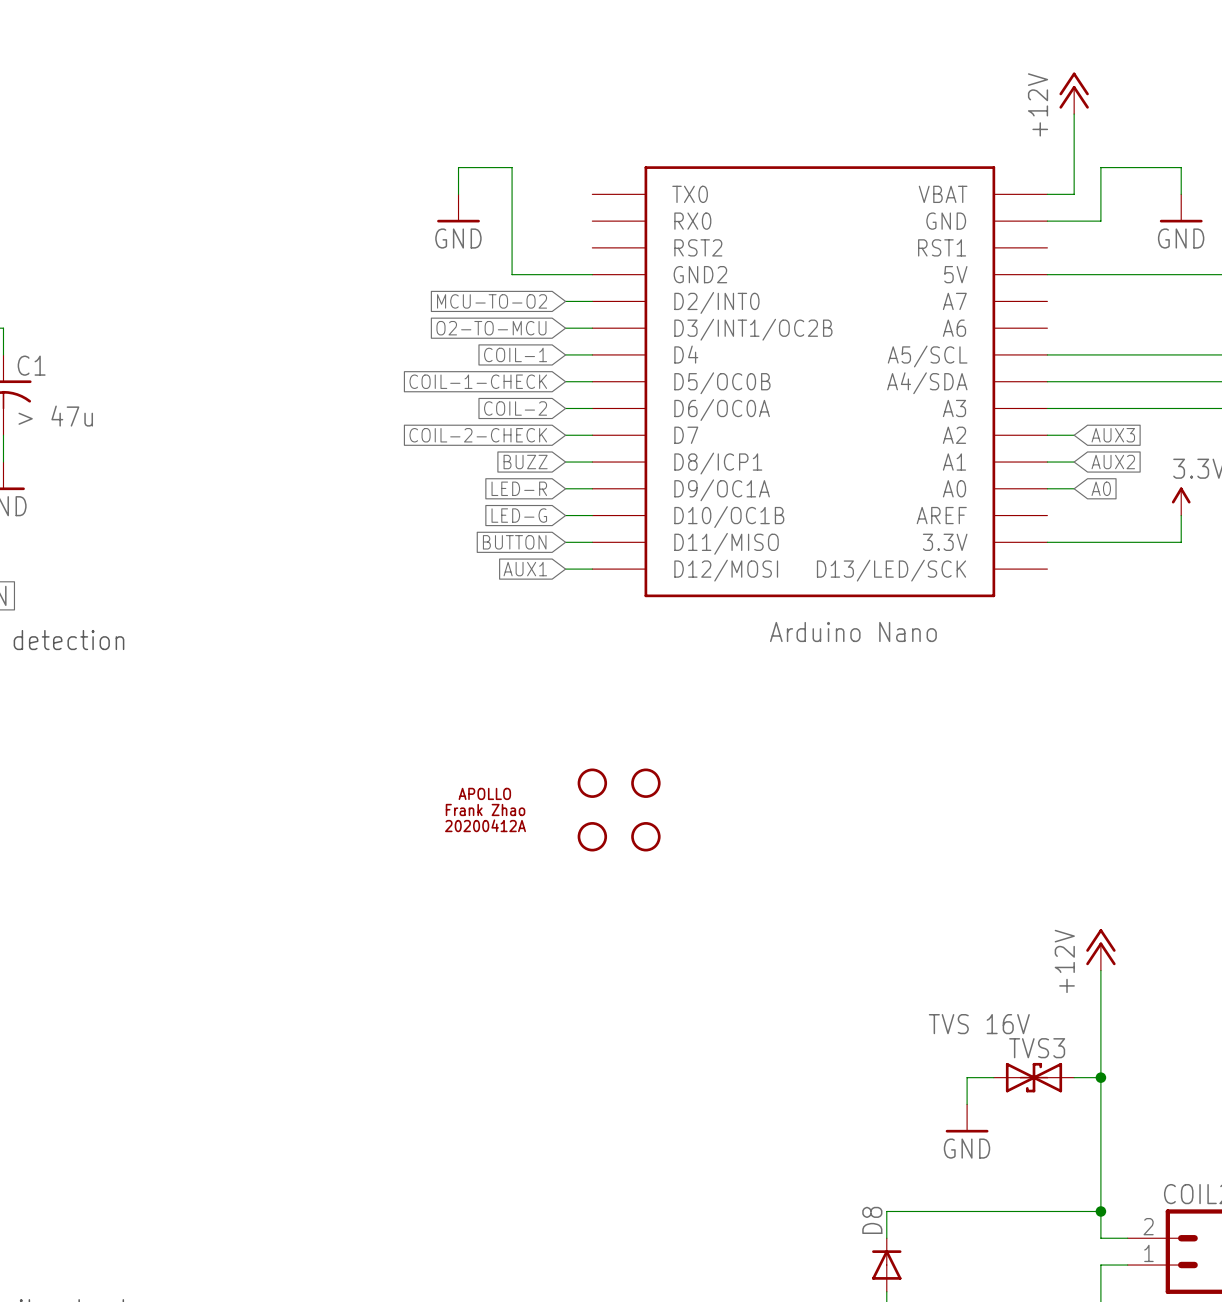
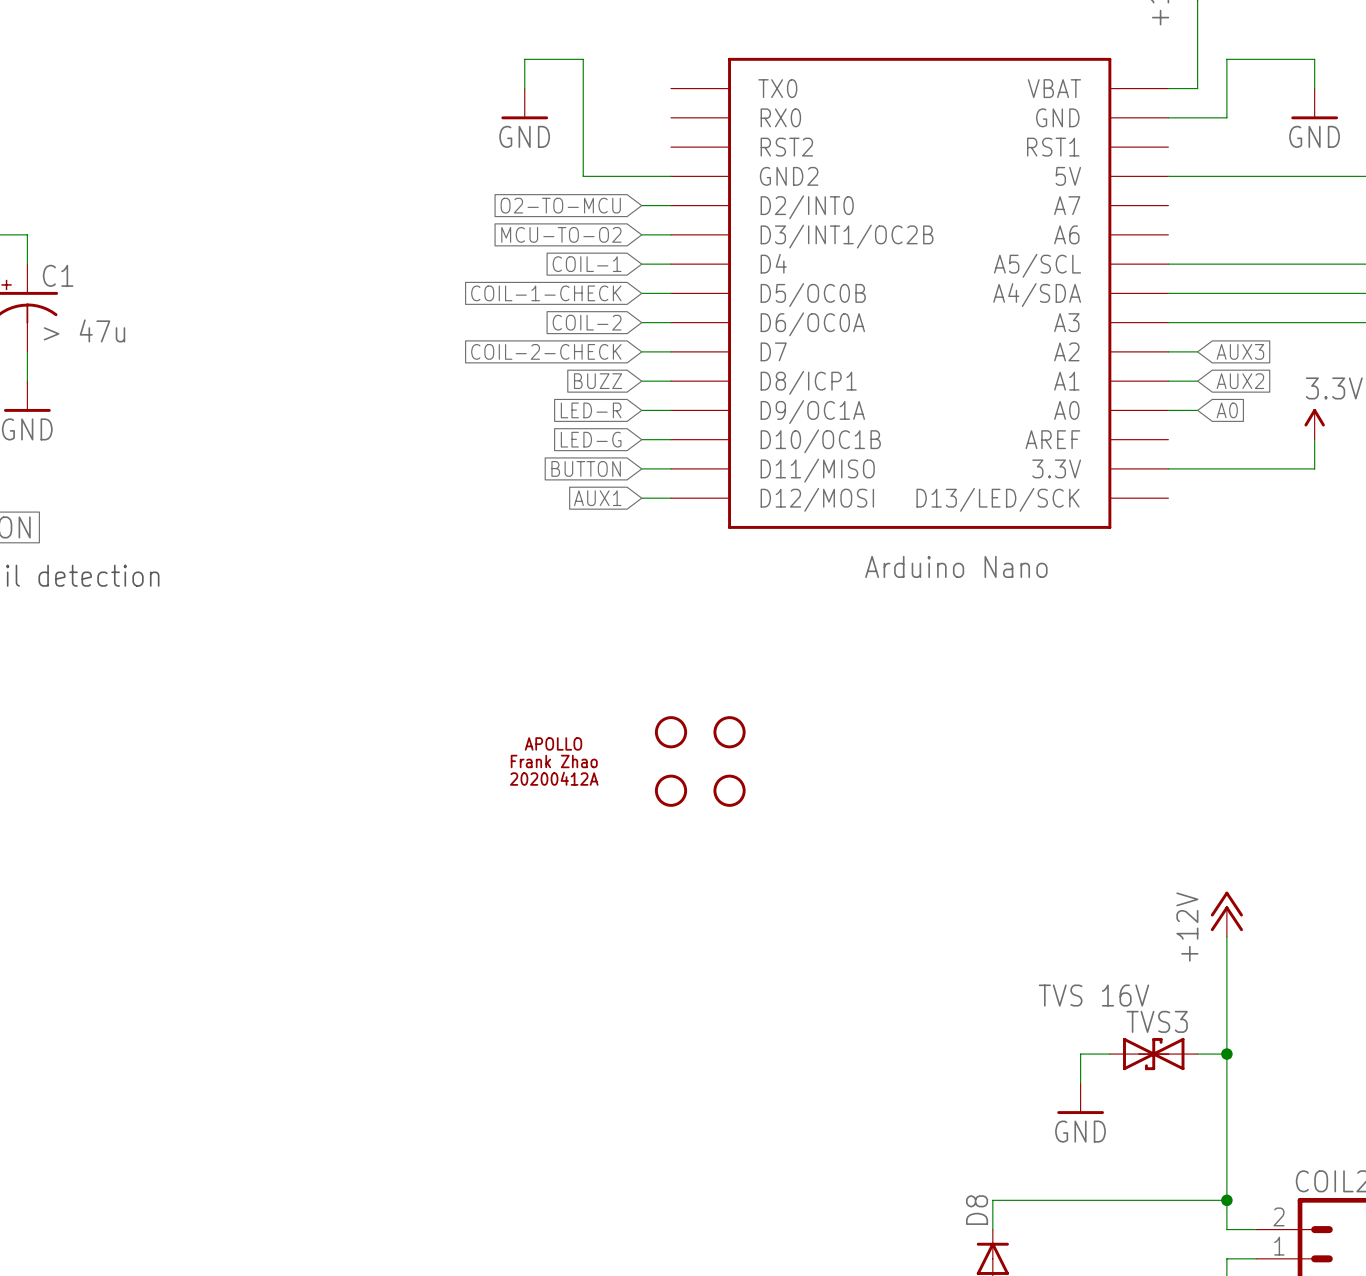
global label: MCU-TO-O2 (492, 301) -> O2-TO-MCU (560, 205)
global label: O2-TO-MCU (491, 328) -> MCU-TO-O2 (561, 234)

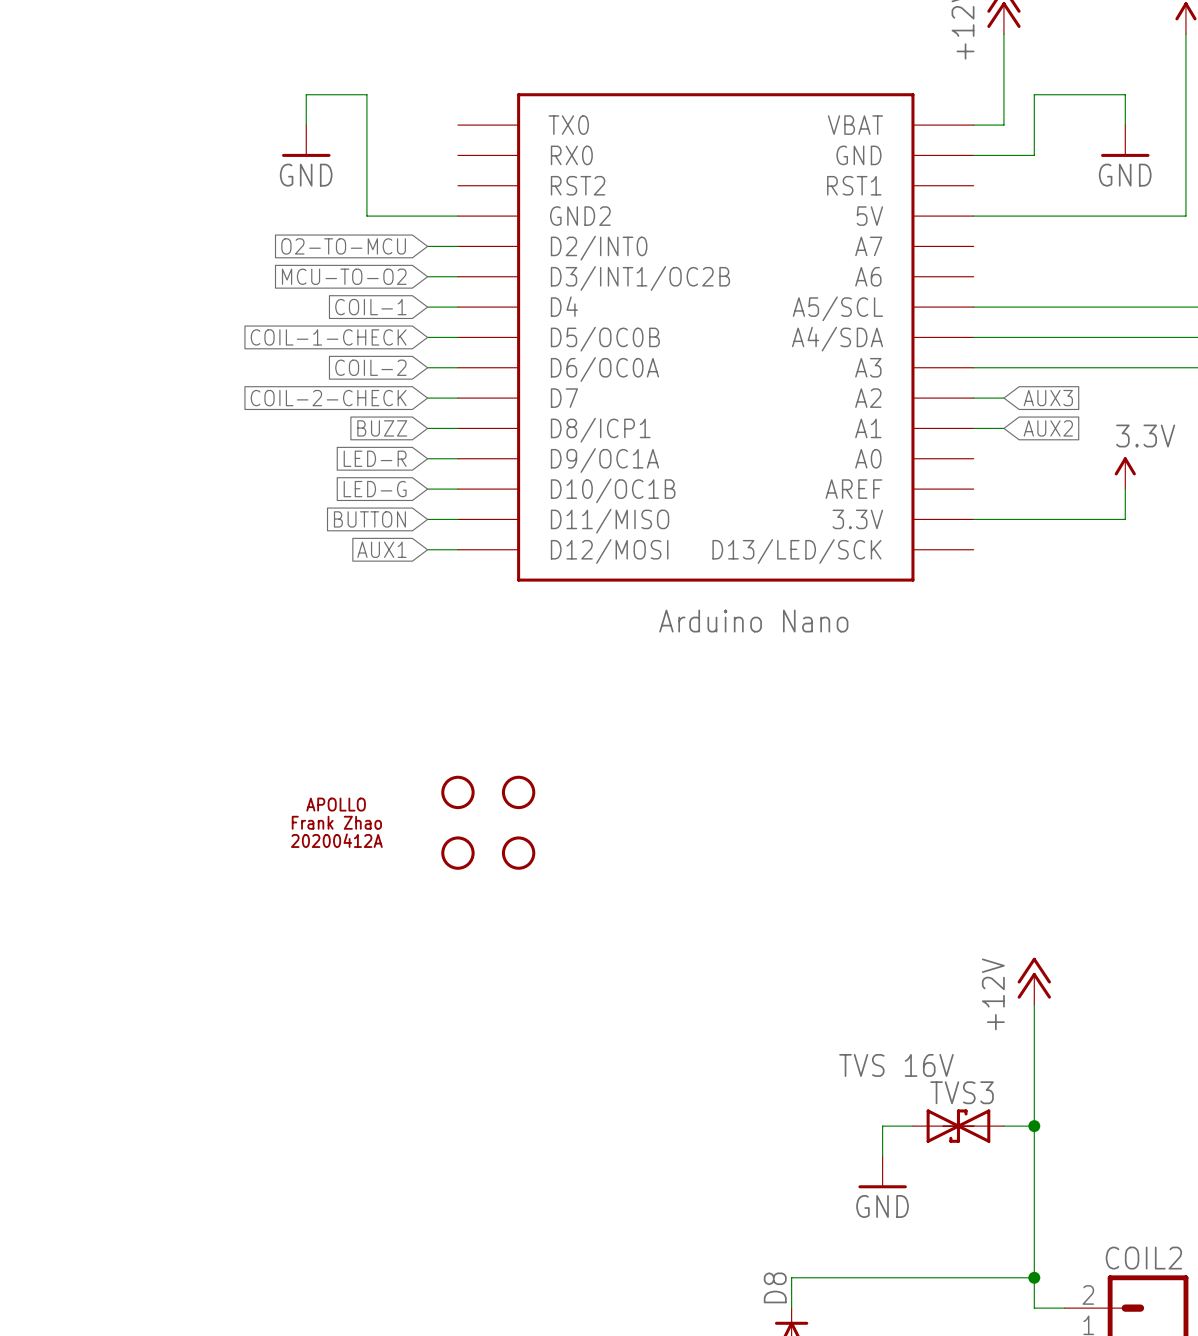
wire: (1168, 410) (1197, 410) -> none
global label: A0 (1227, 410) -> none

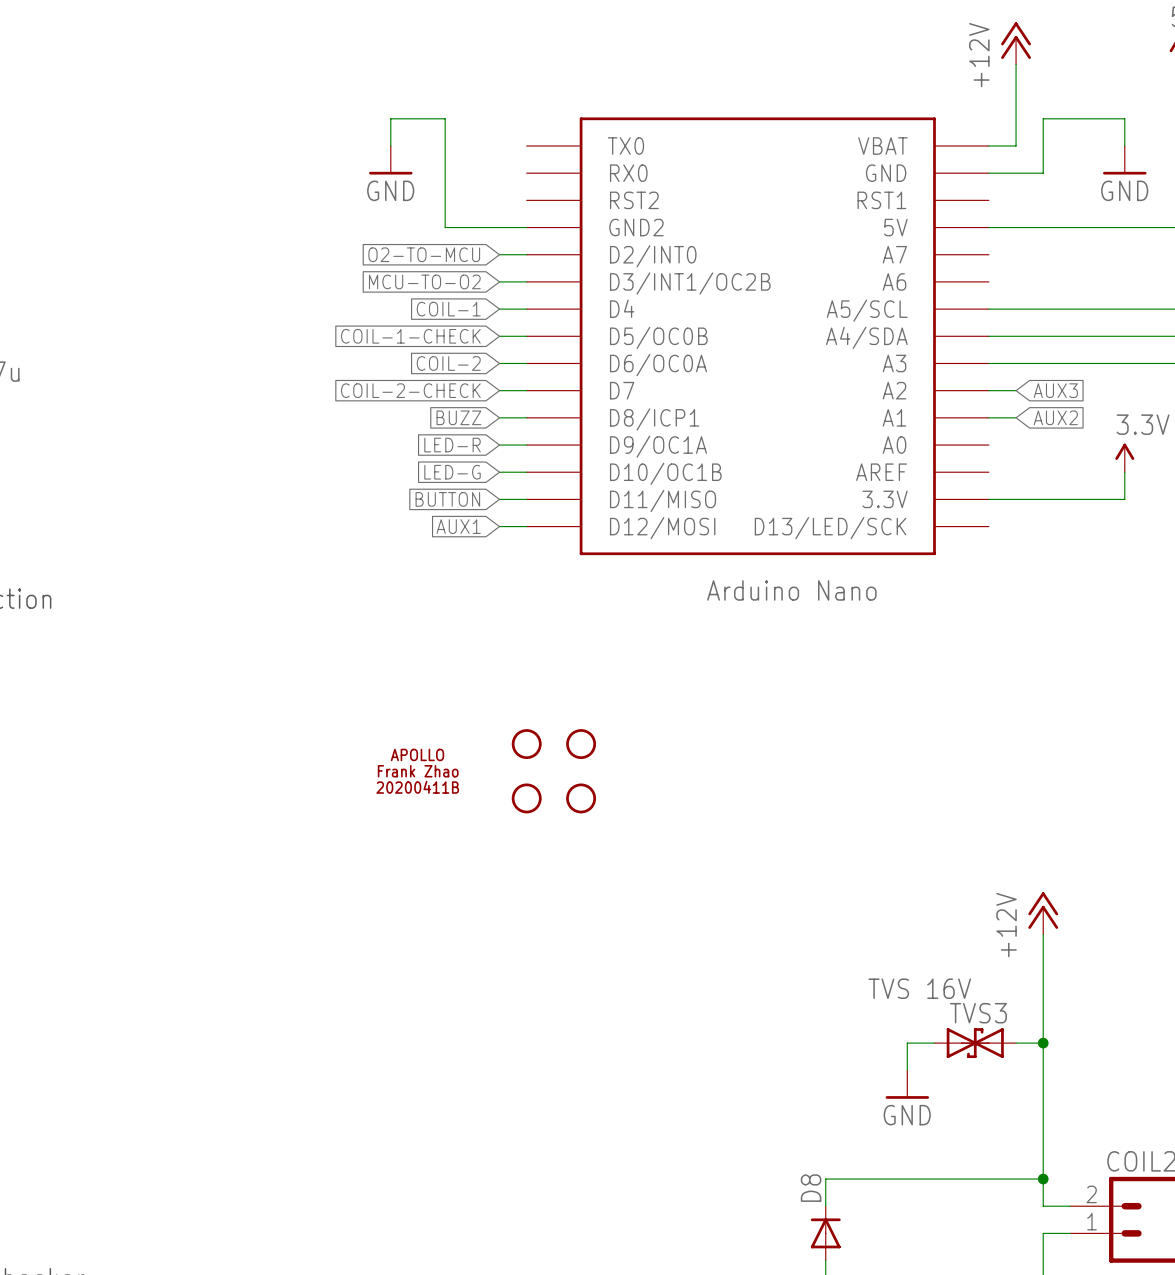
part text: 20200412A (336, 840) -> 20200411B (417, 787)

